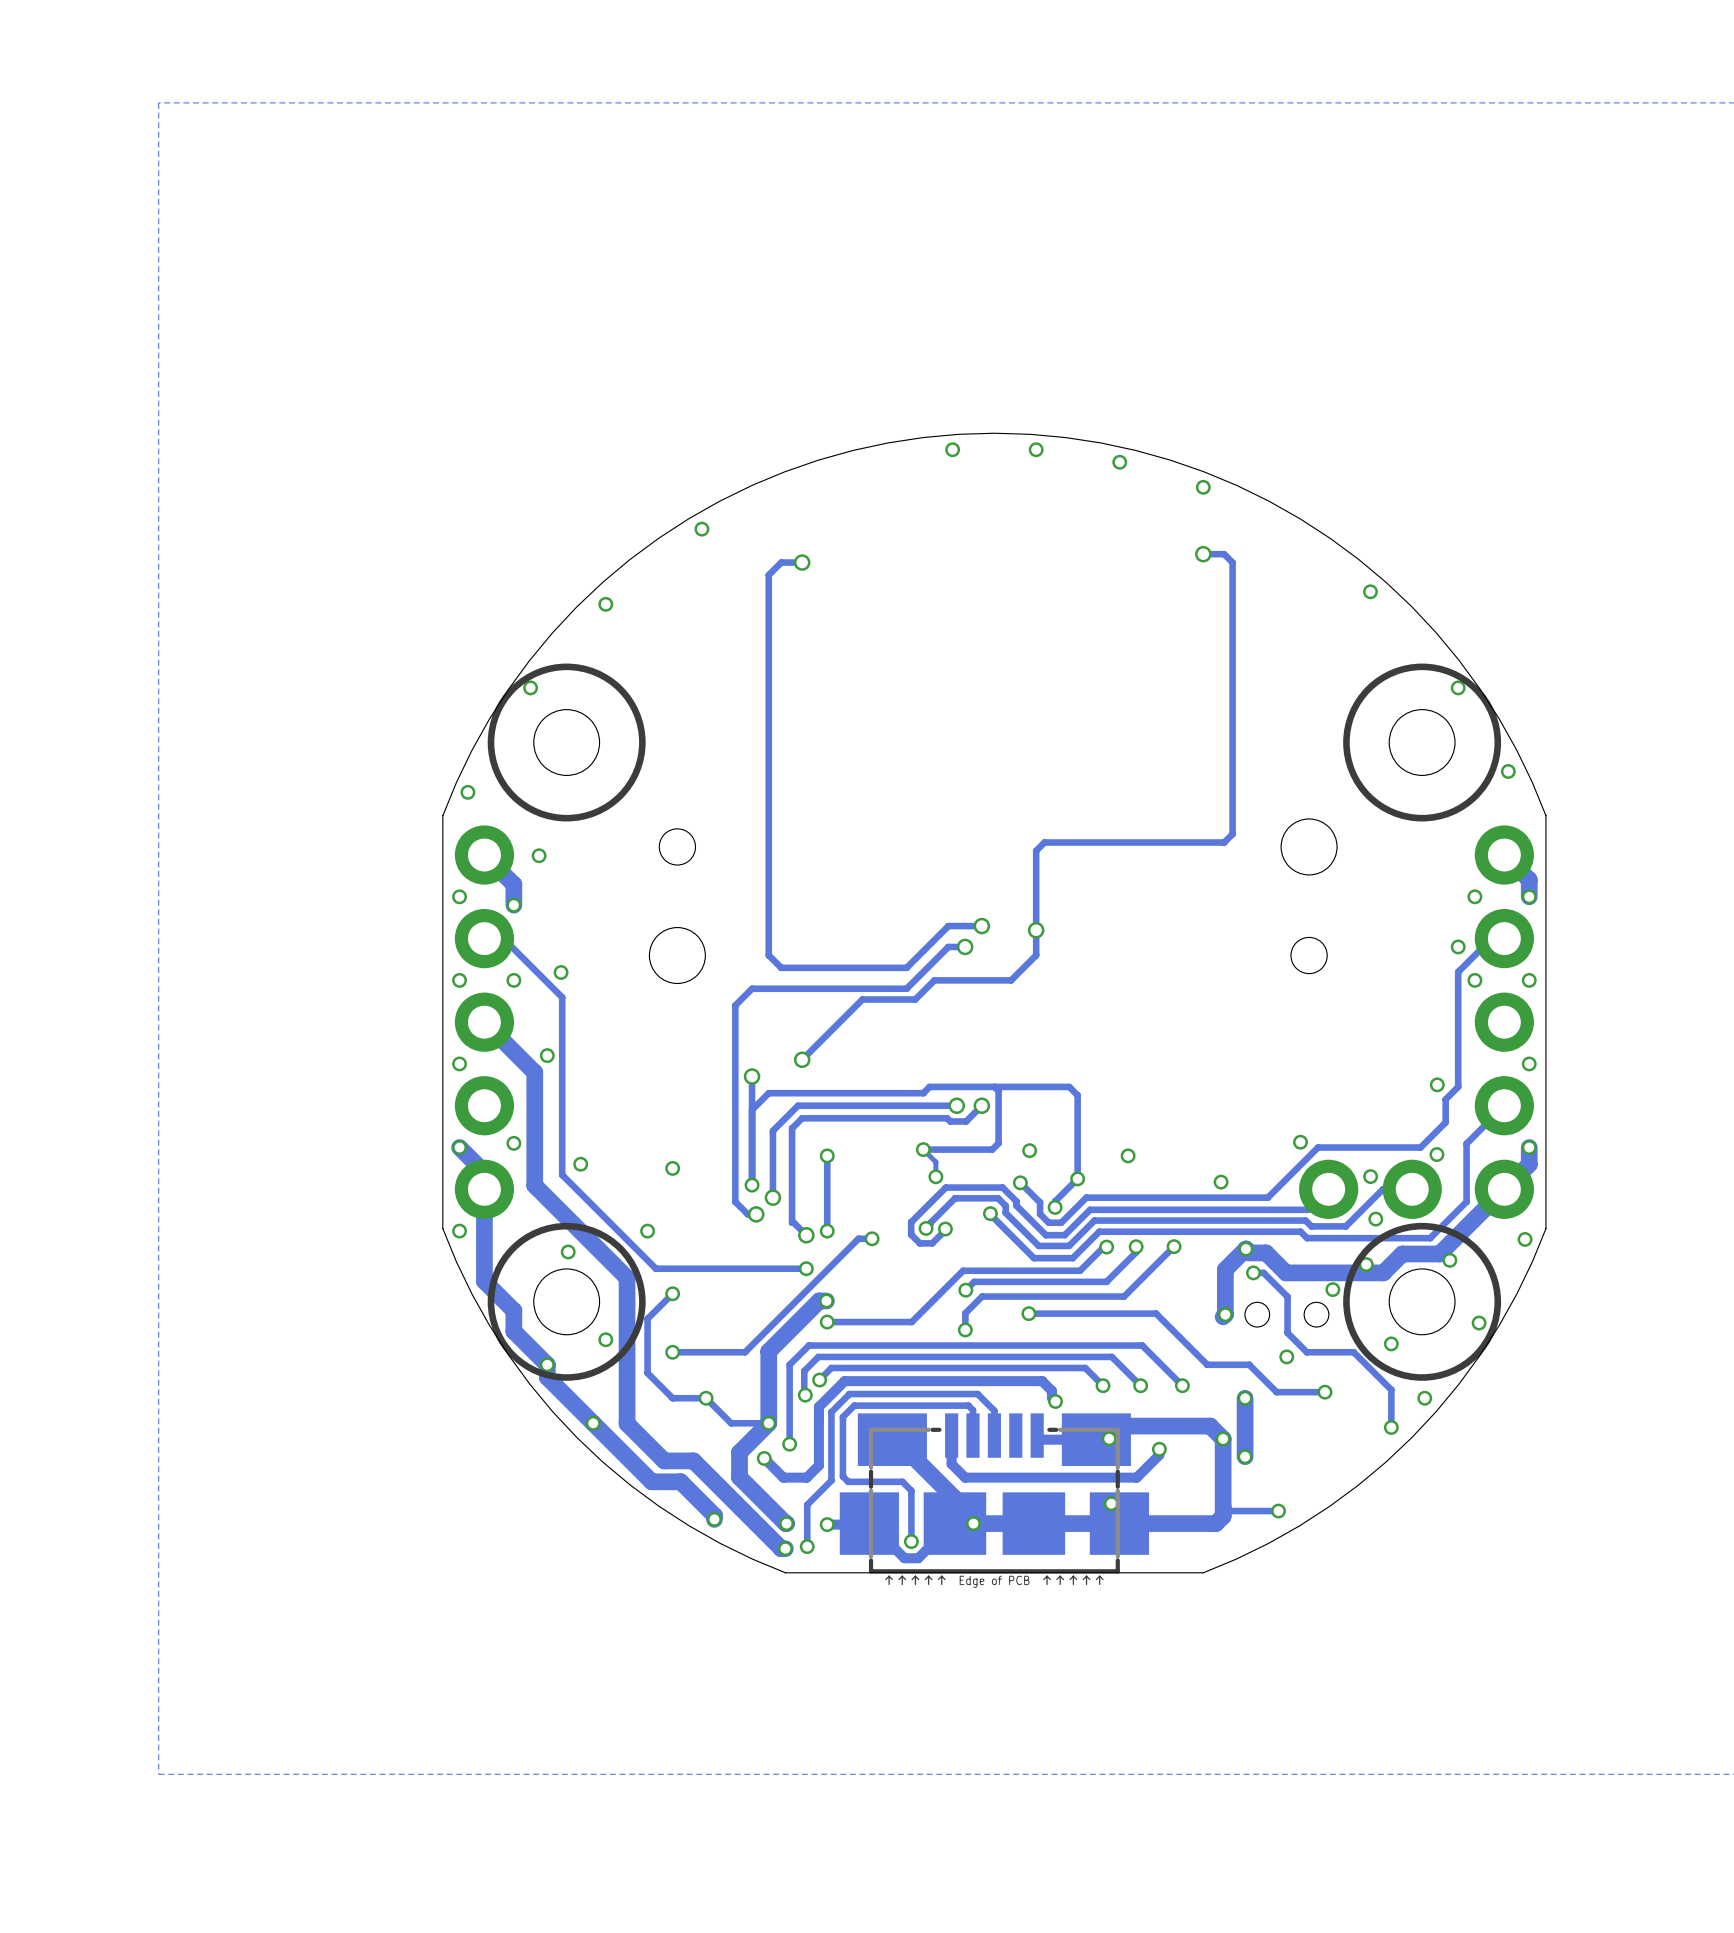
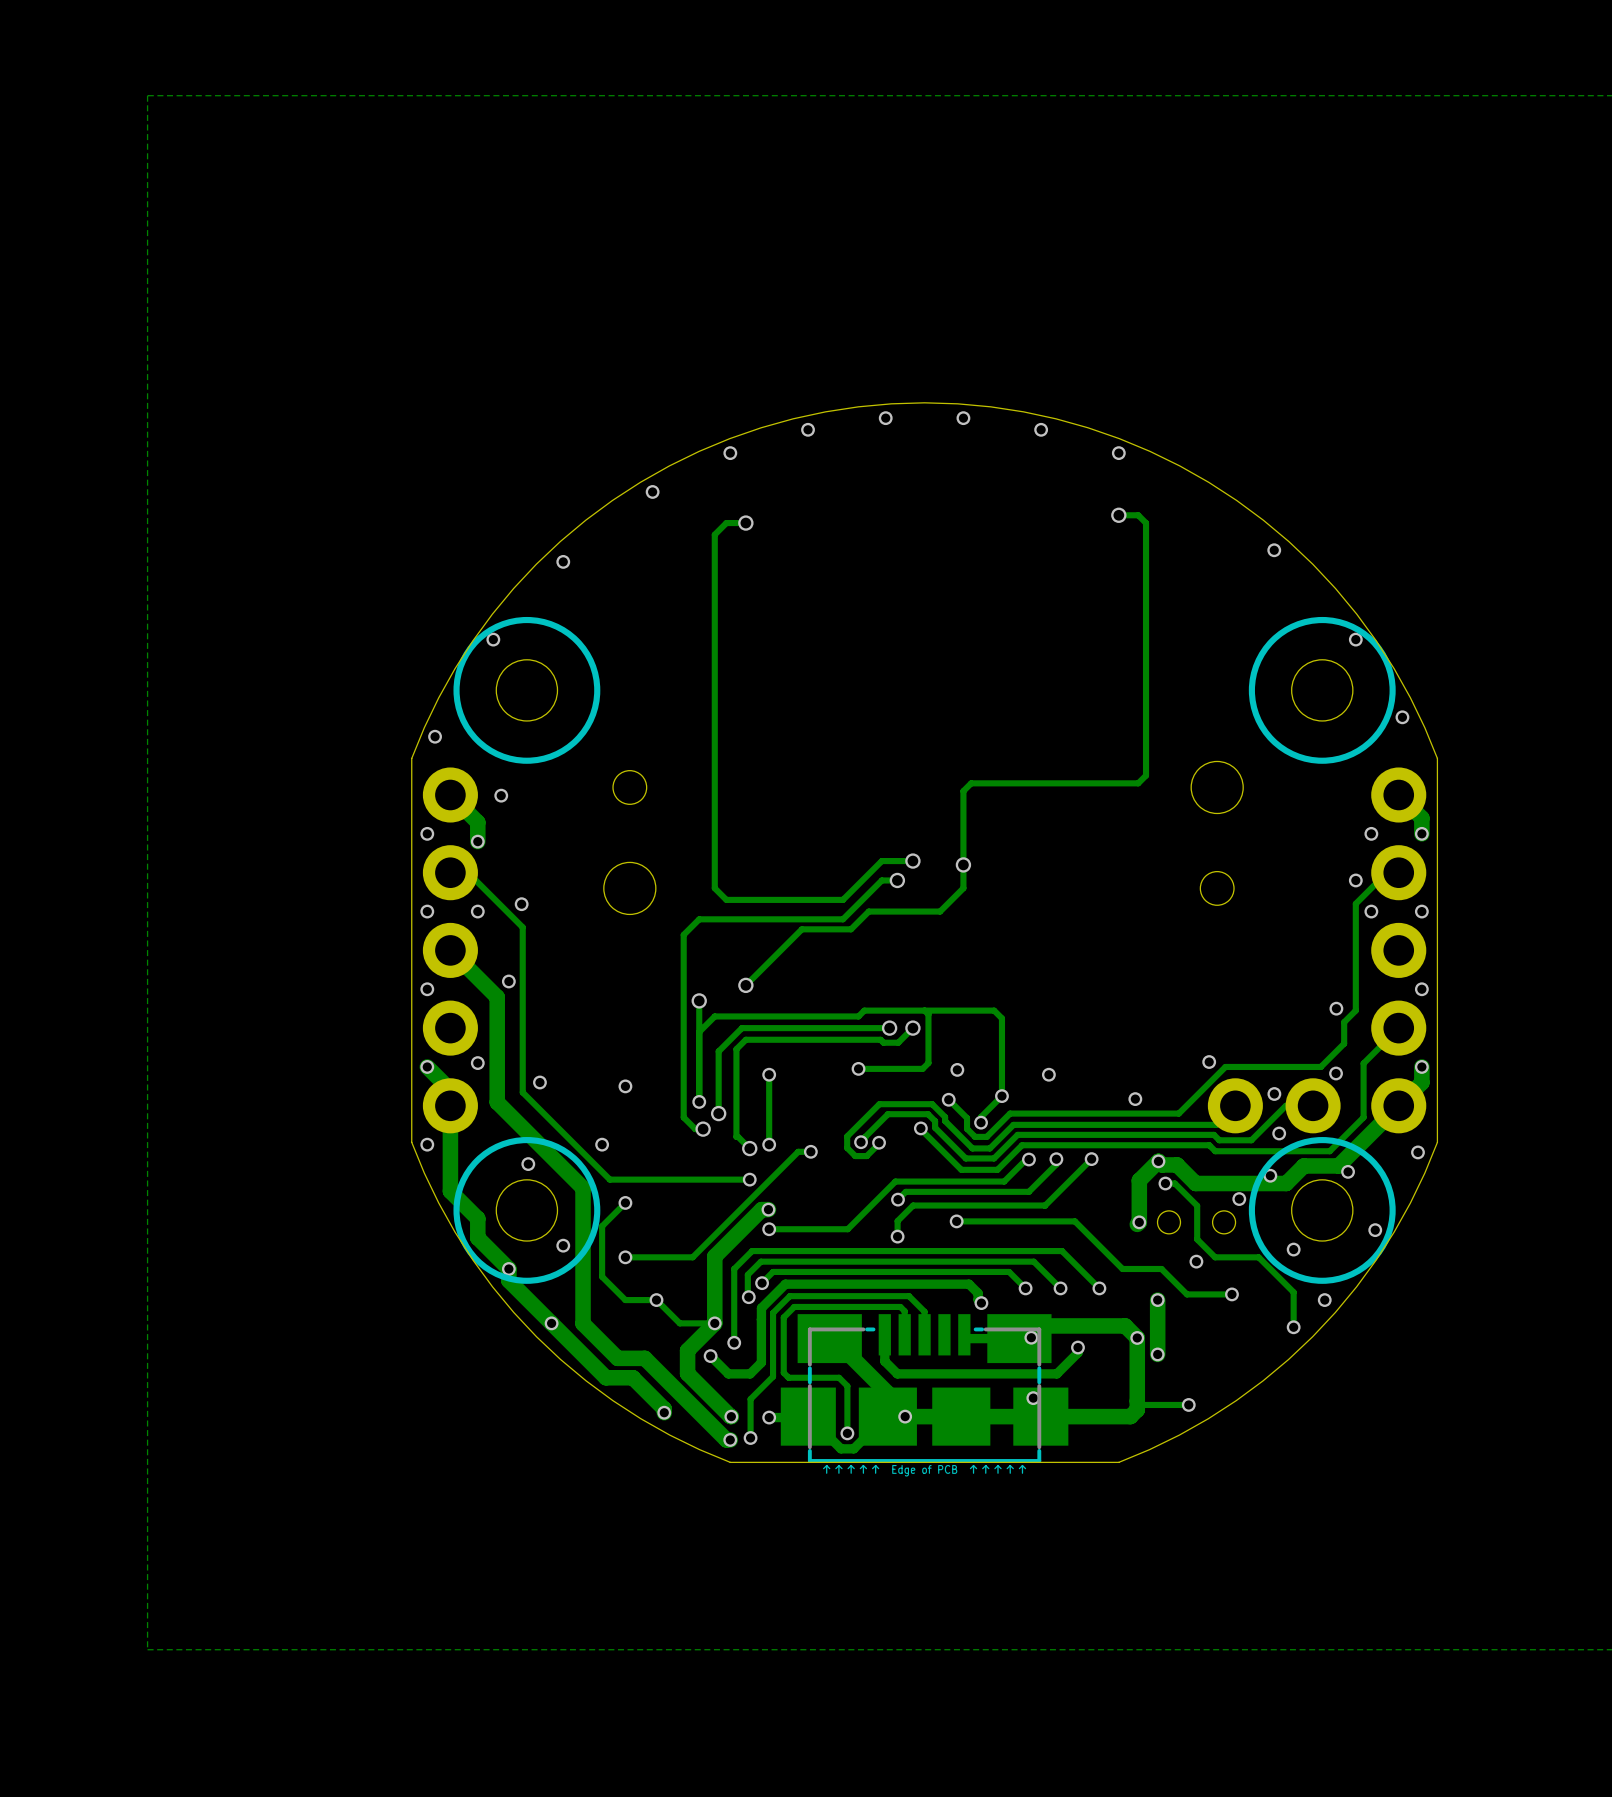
via: none -> (808, 429)
via: none -> (730, 453)
track: (923, 1149) (935, 1162) (935, 1176) -> none
via: (935, 1176) -> none

